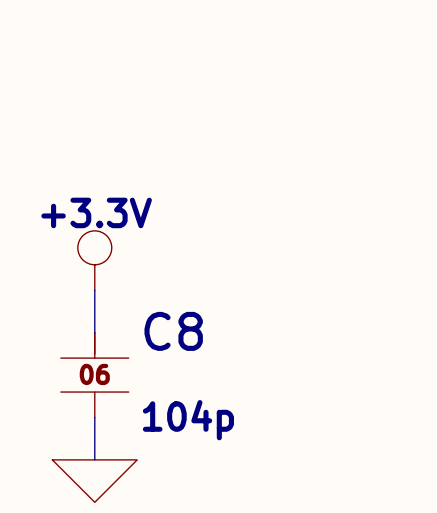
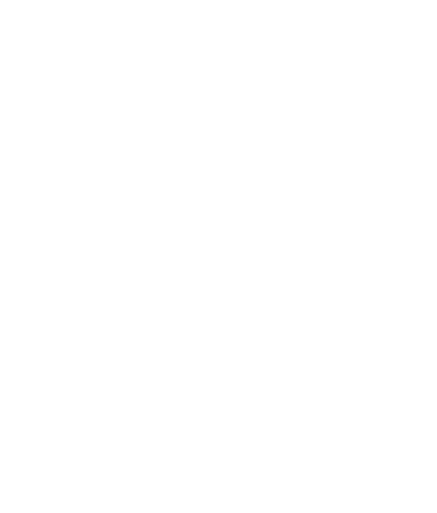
power symbol: +3.3V (94, 260) -> none
wire: (94, 290) (94, 332) -> none
C8: (94, 375) -> none
wire: (94, 417) (94, 459) -> none
power symbol: (94, 481) -> none

